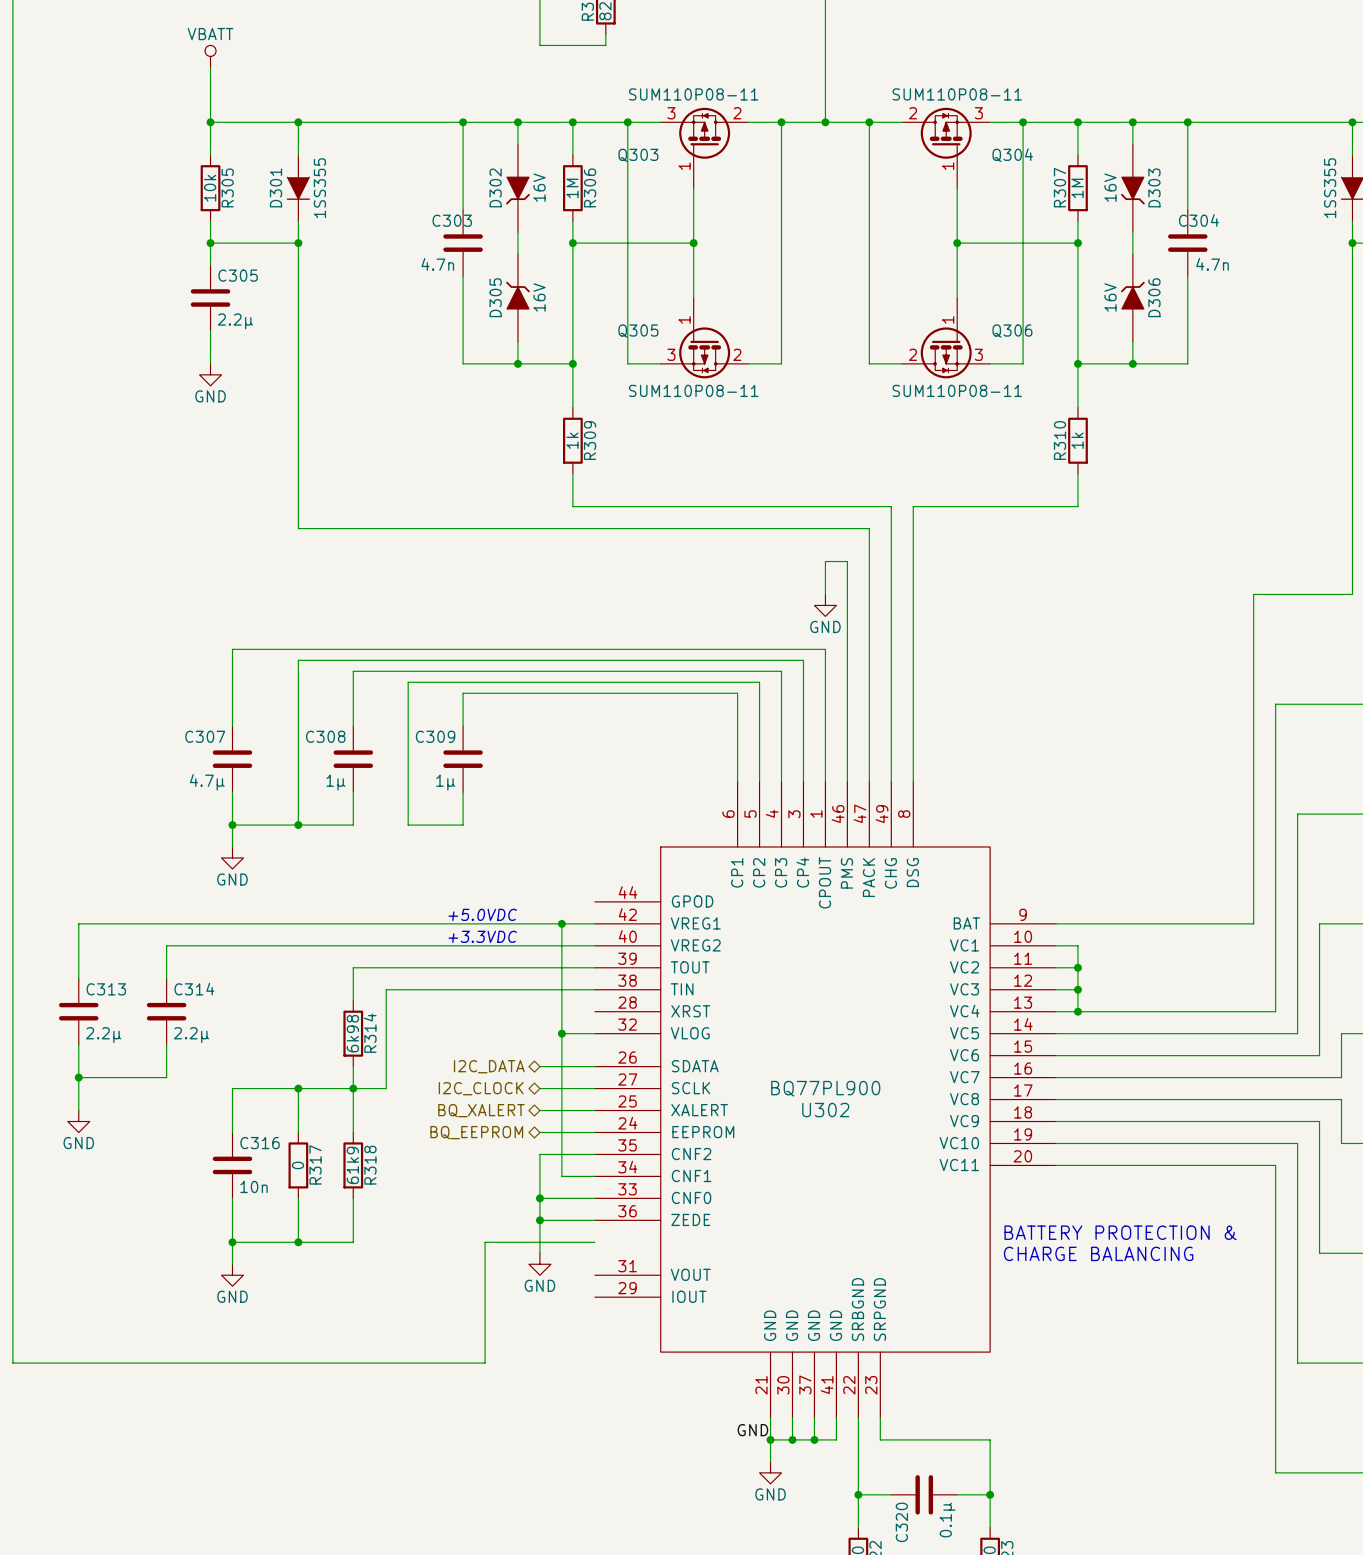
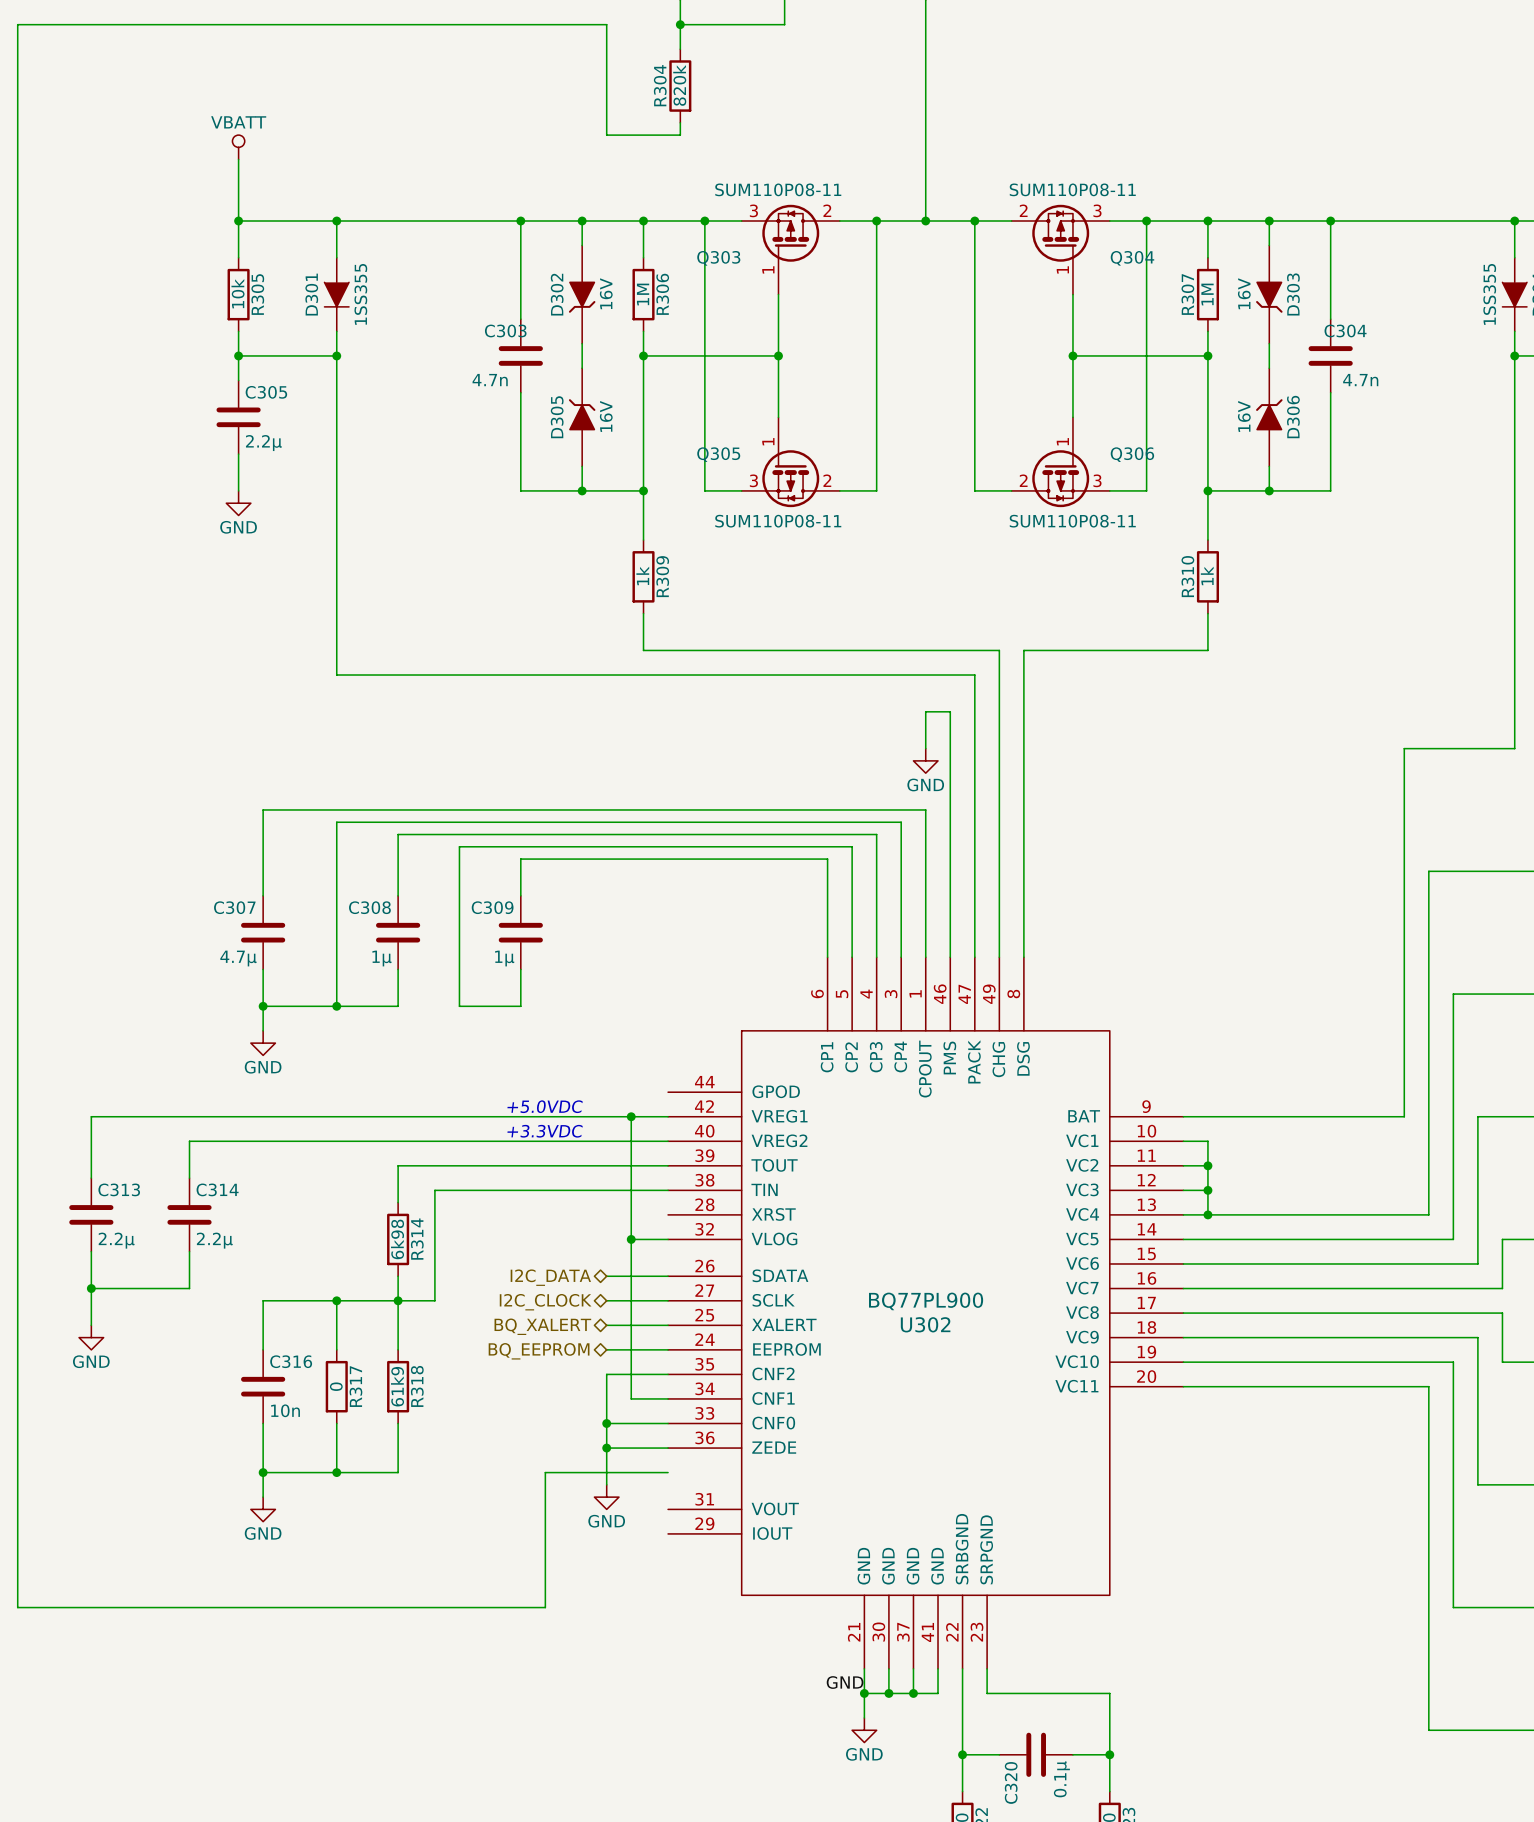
text: BATTERY PROTECTION & (1120, 1232) -> none
text: CHARGE BALANCING (1098, 1253) -> none

